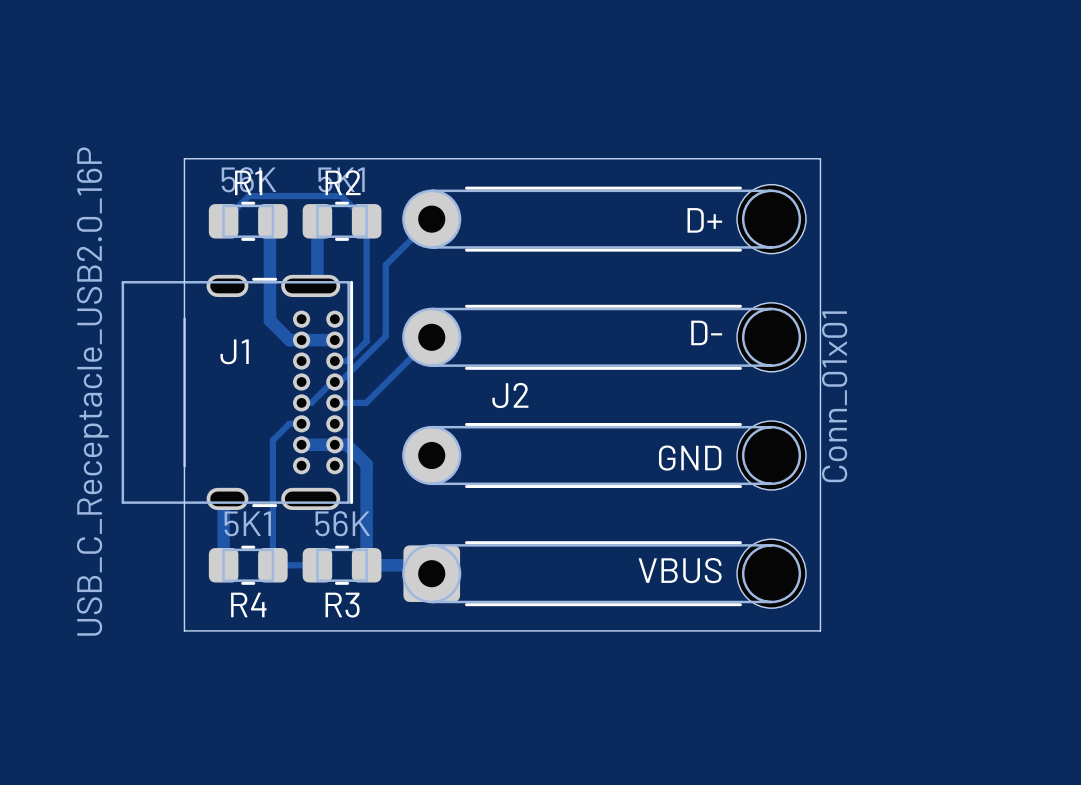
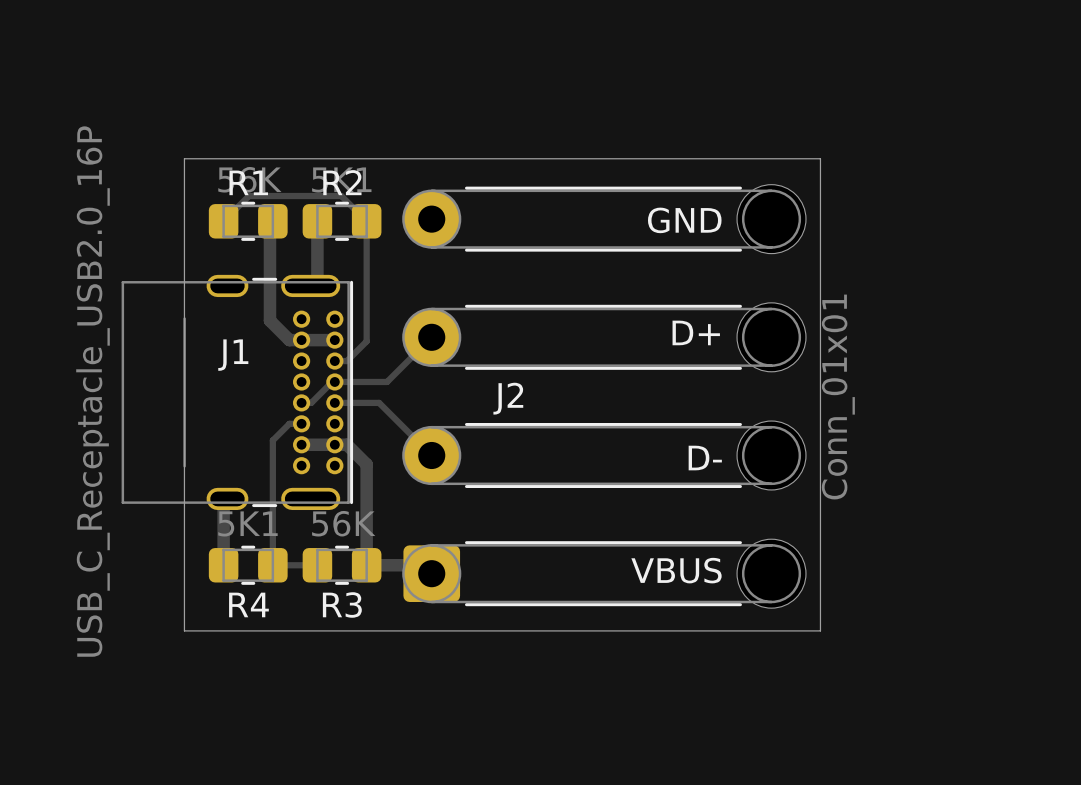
track: (431, 219) (385, 265) (385, 336) (340, 381) -> none
text: D+ (704, 220) -> GND (684, 220)
text: D- (706, 332) -> D+ (696, 332)
track: (387, 381) (366, 402) -> (387, 381) (340, 381)
track: none -> (366, 402) (379, 402) (431, 455)
text: GND (690, 458) -> D- (705, 458)

